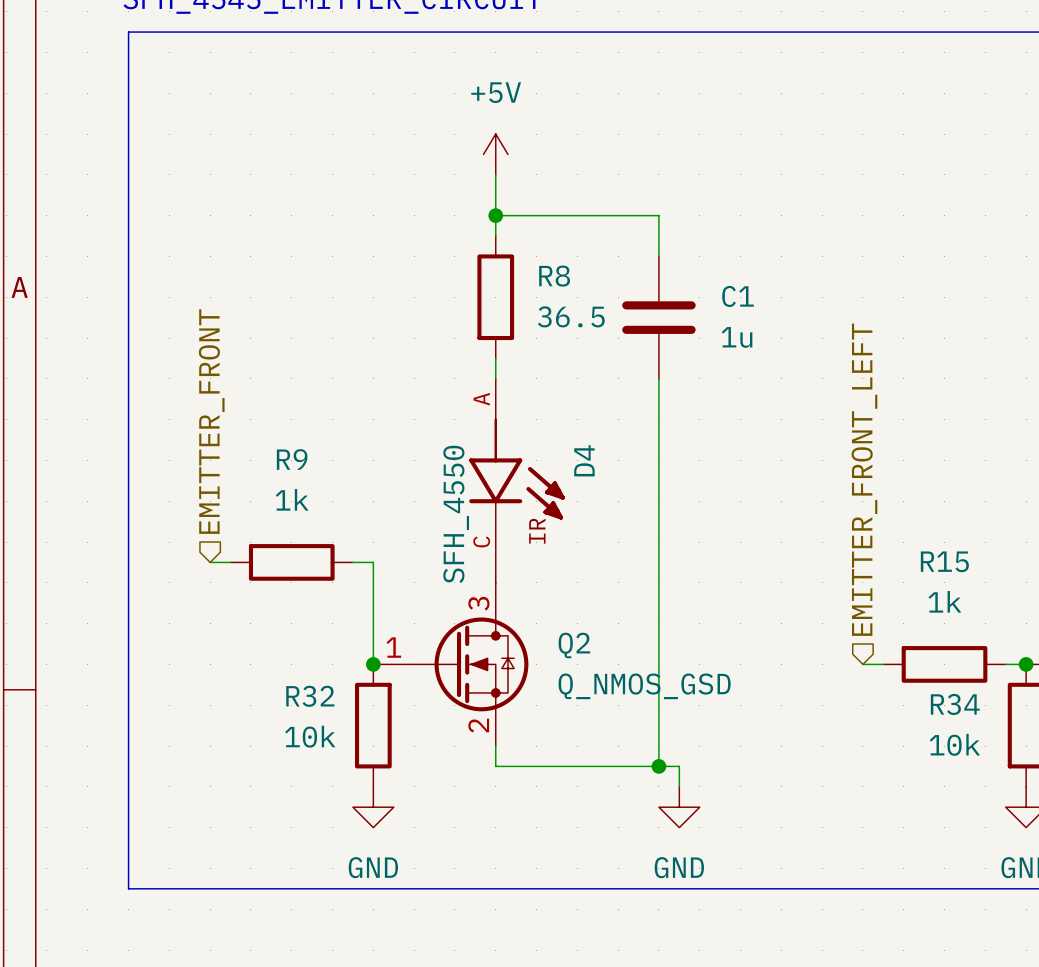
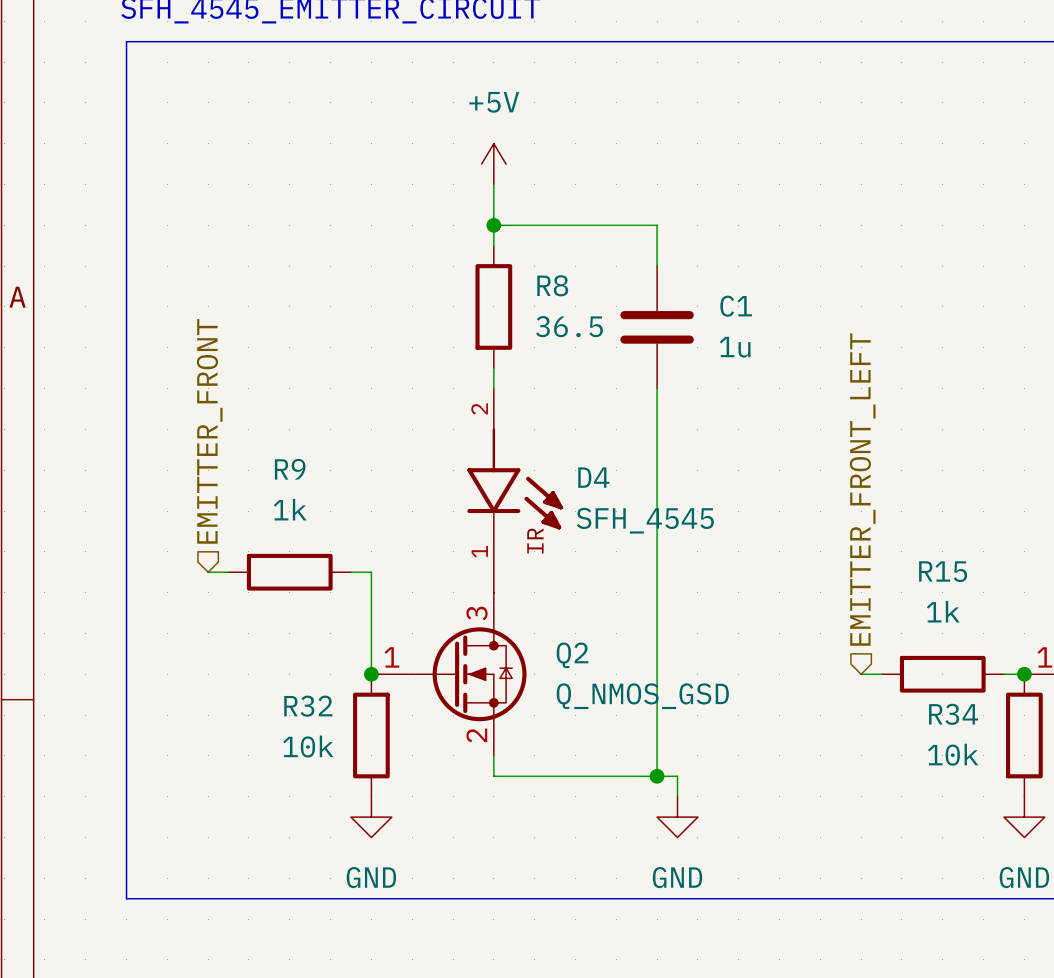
D4 pin number: A (481, 399) -> 2 (479, 408)
D4 name rotation: 0° (584, 460) -> 90° clockwise (593, 477)
D4 value: SFH_4550 (456, 514) -> SFH_4545 (645, 520)
D4 pin number: C (481, 541) -> 1 (479, 551)

